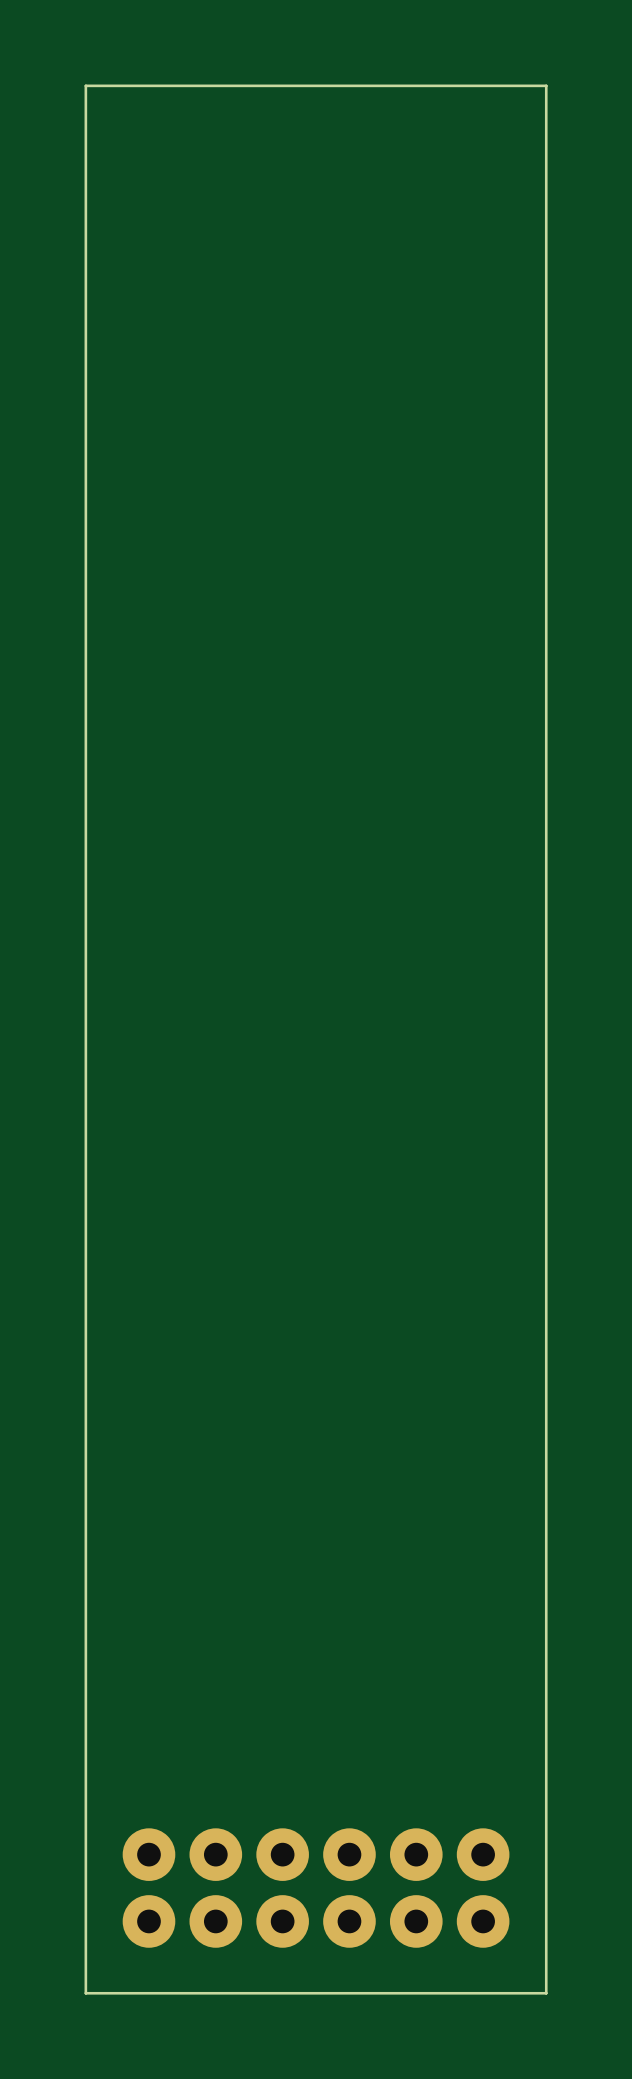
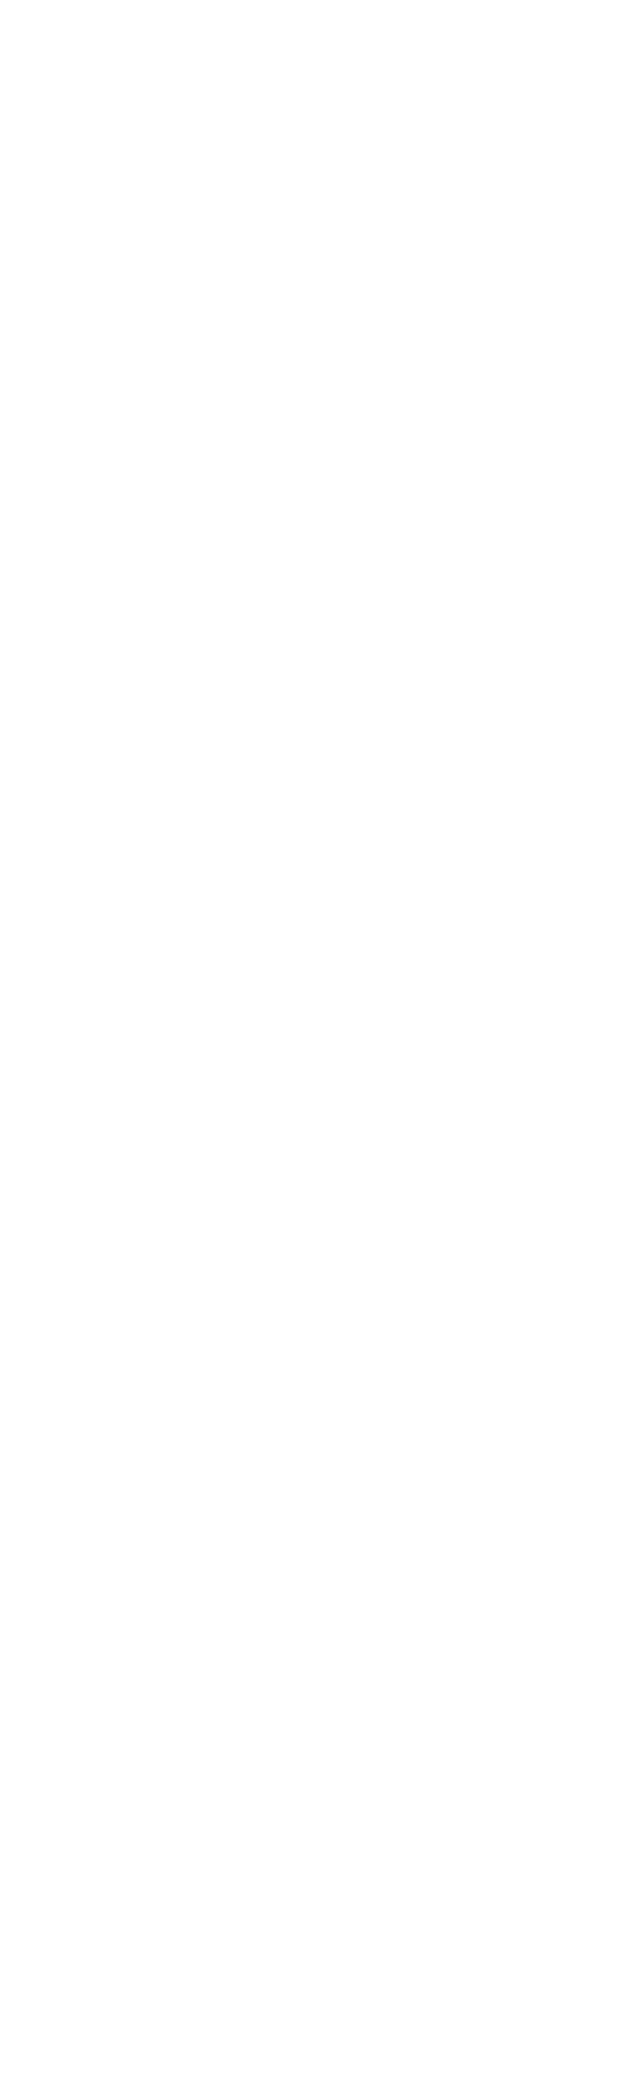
board edge: (546, 85) (546, 1993) (85, 1993) (85, 85) (546, 85) -> none
part: (316, 1888) -> none

